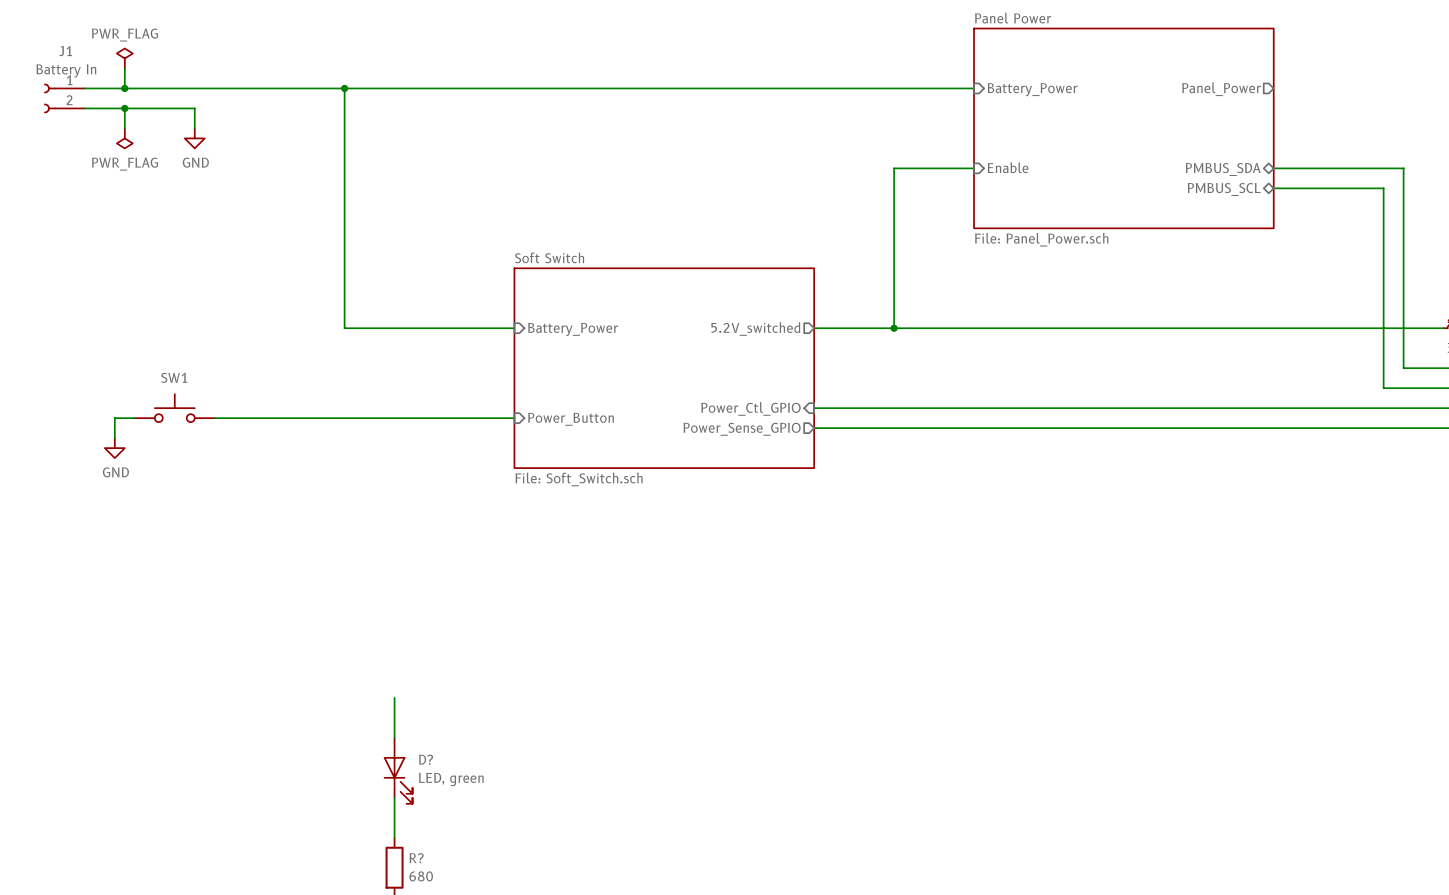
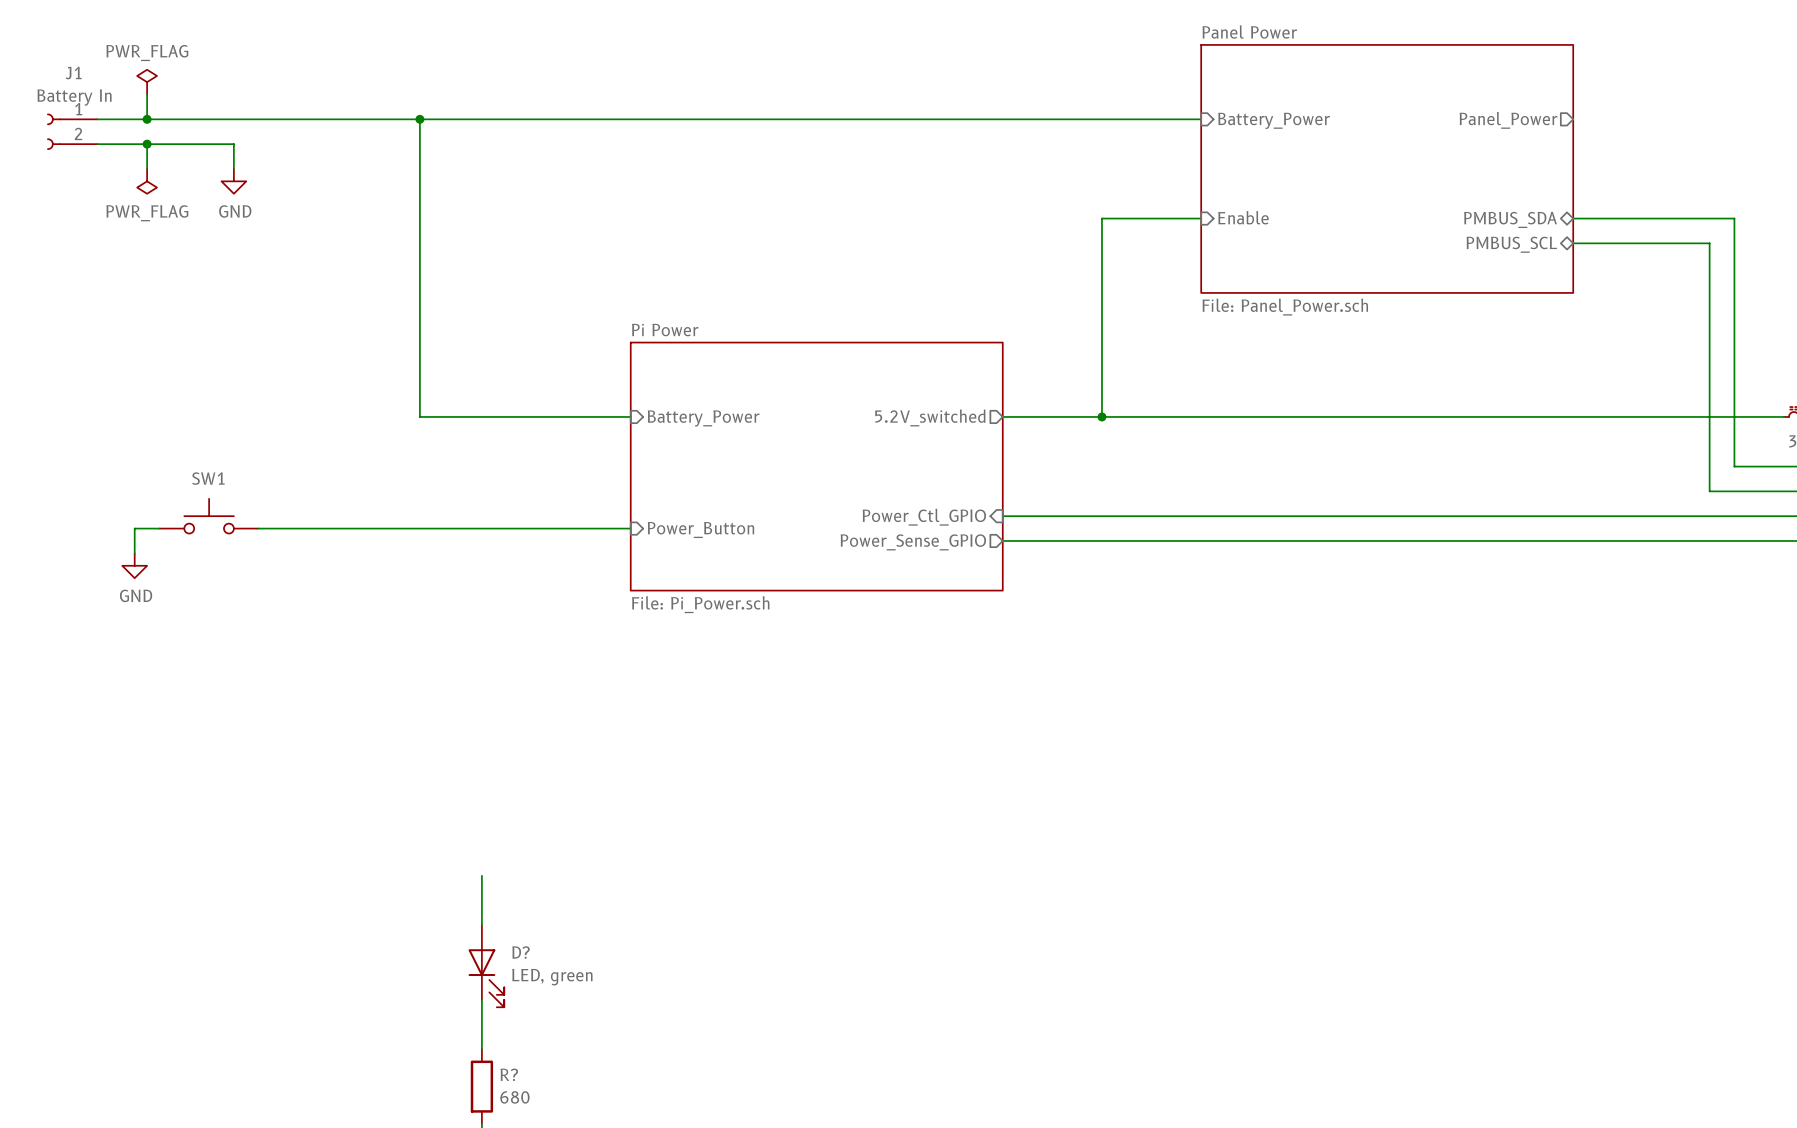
sheet Soft Switch name: Soft Switch (549, 257) -> Pi Power (665, 330)
sheet Soft Switch value: File: Soft_Switch.sch (579, 479) -> File: Pi_Power.sch (700, 604)

